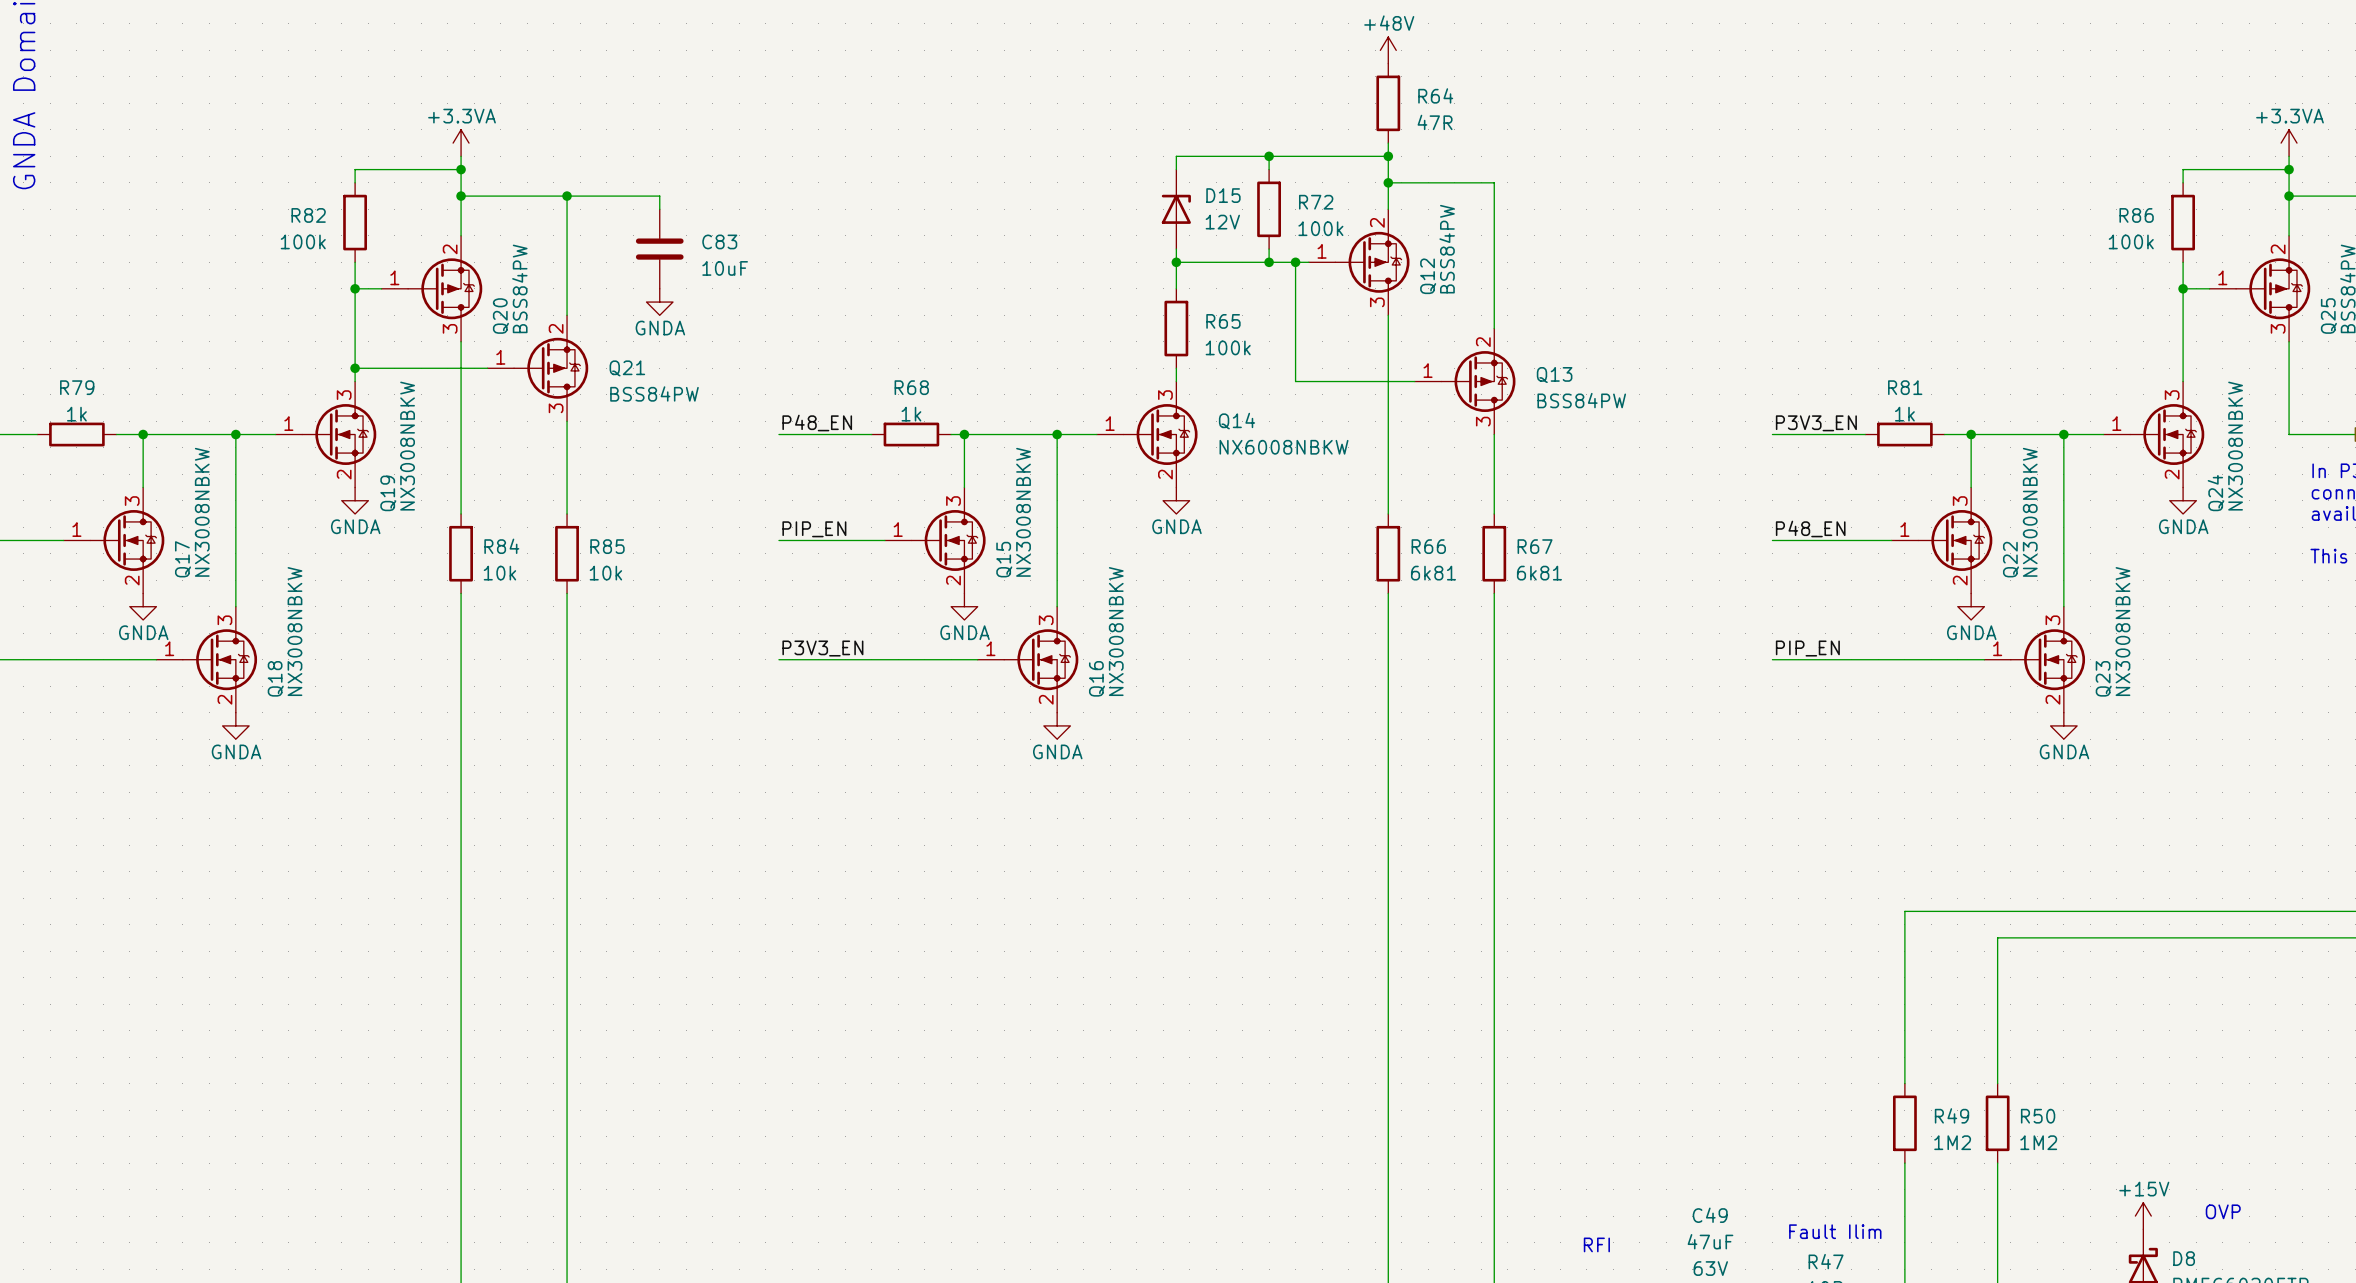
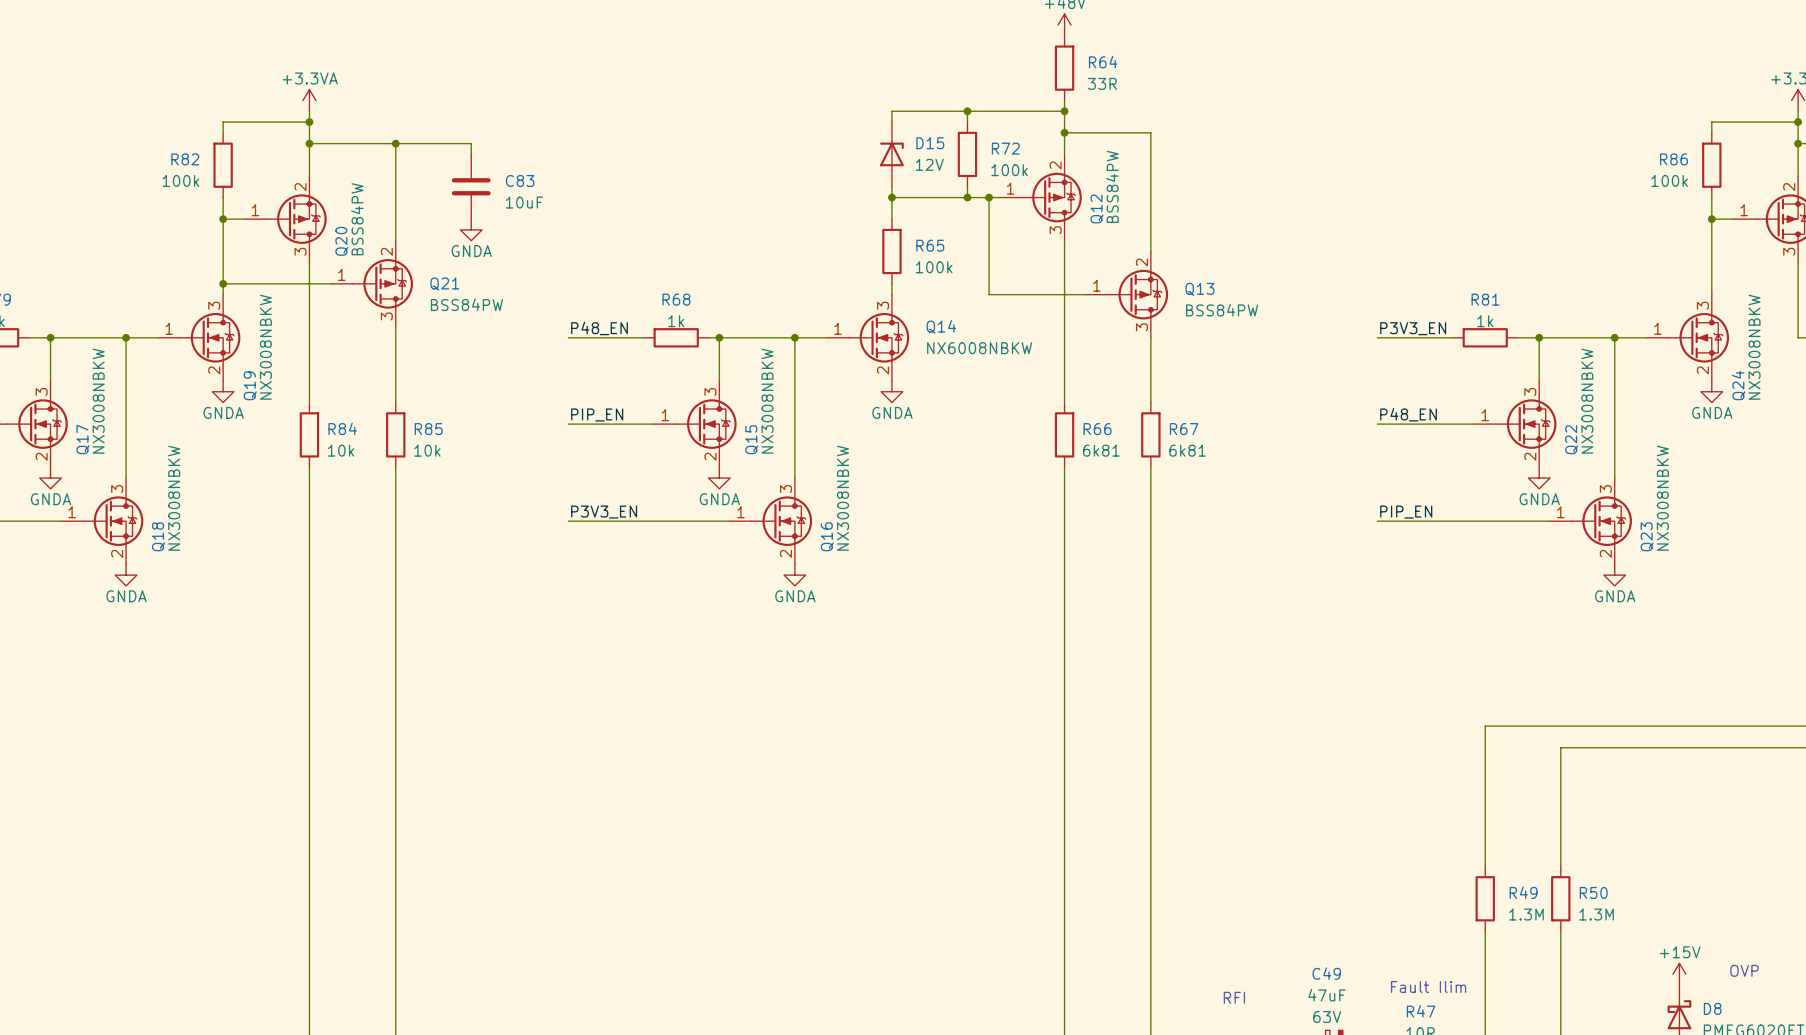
R64 value: 47R (1435, 122) -> 33R (1102, 83)
R49 value: 1M2 (1952, 1142) -> 1.3M (1526, 914)
R50 value: 1M2 (2038, 1142) -> 1.3M (1596, 914)

